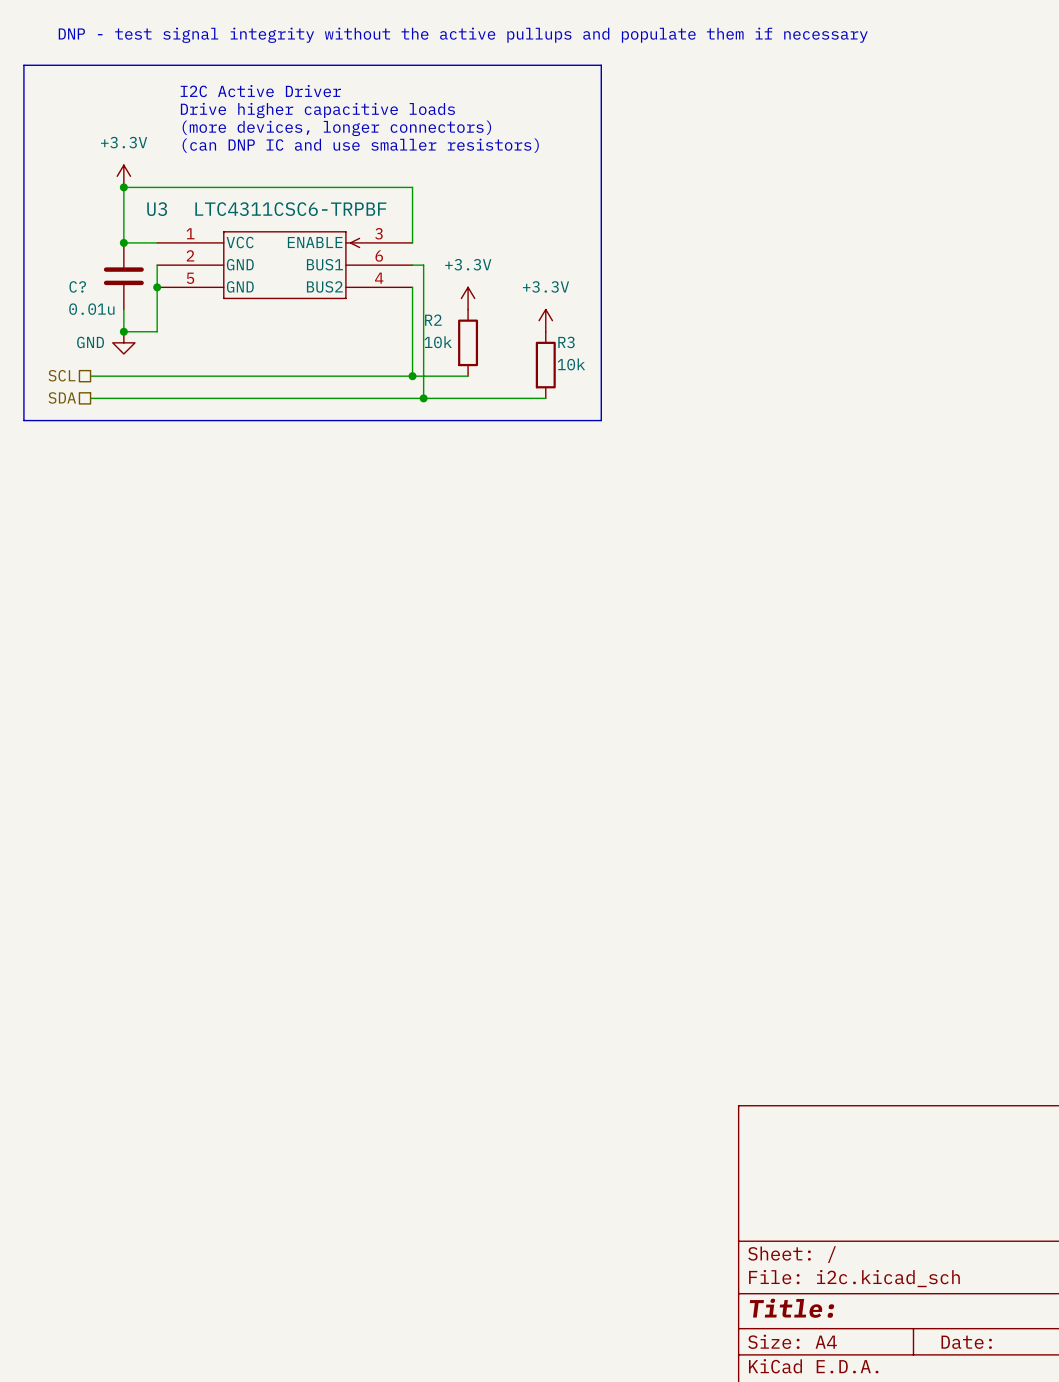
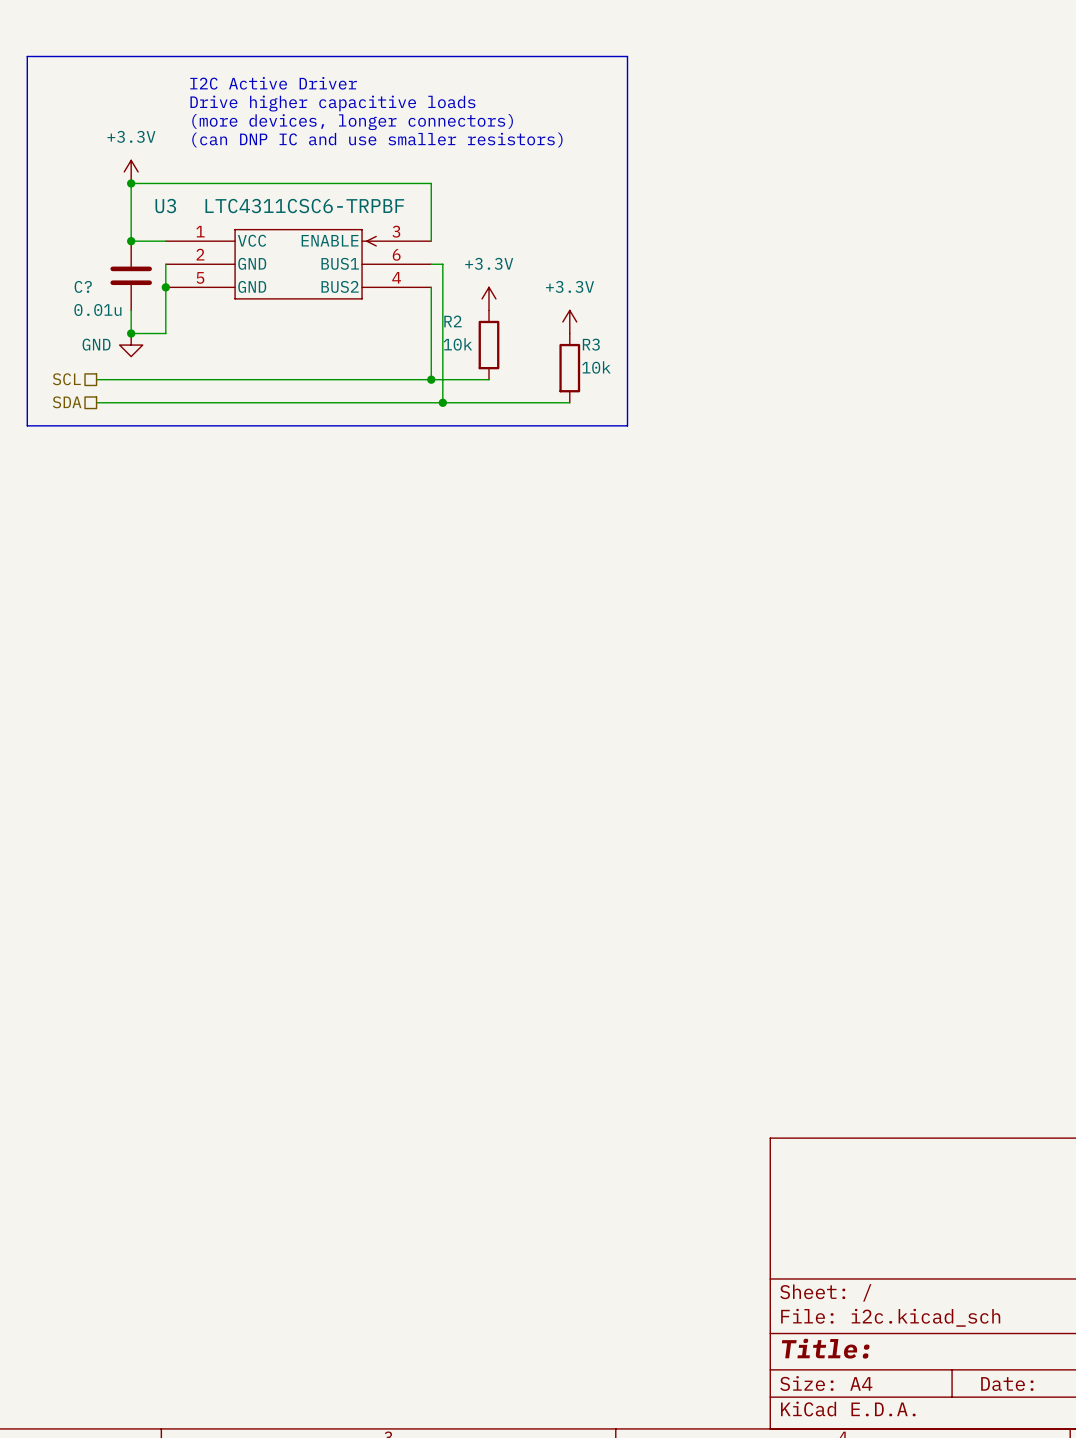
text: DNP - test signal integrity without the active pullups and populate them if necessary (463, 35) -> none

